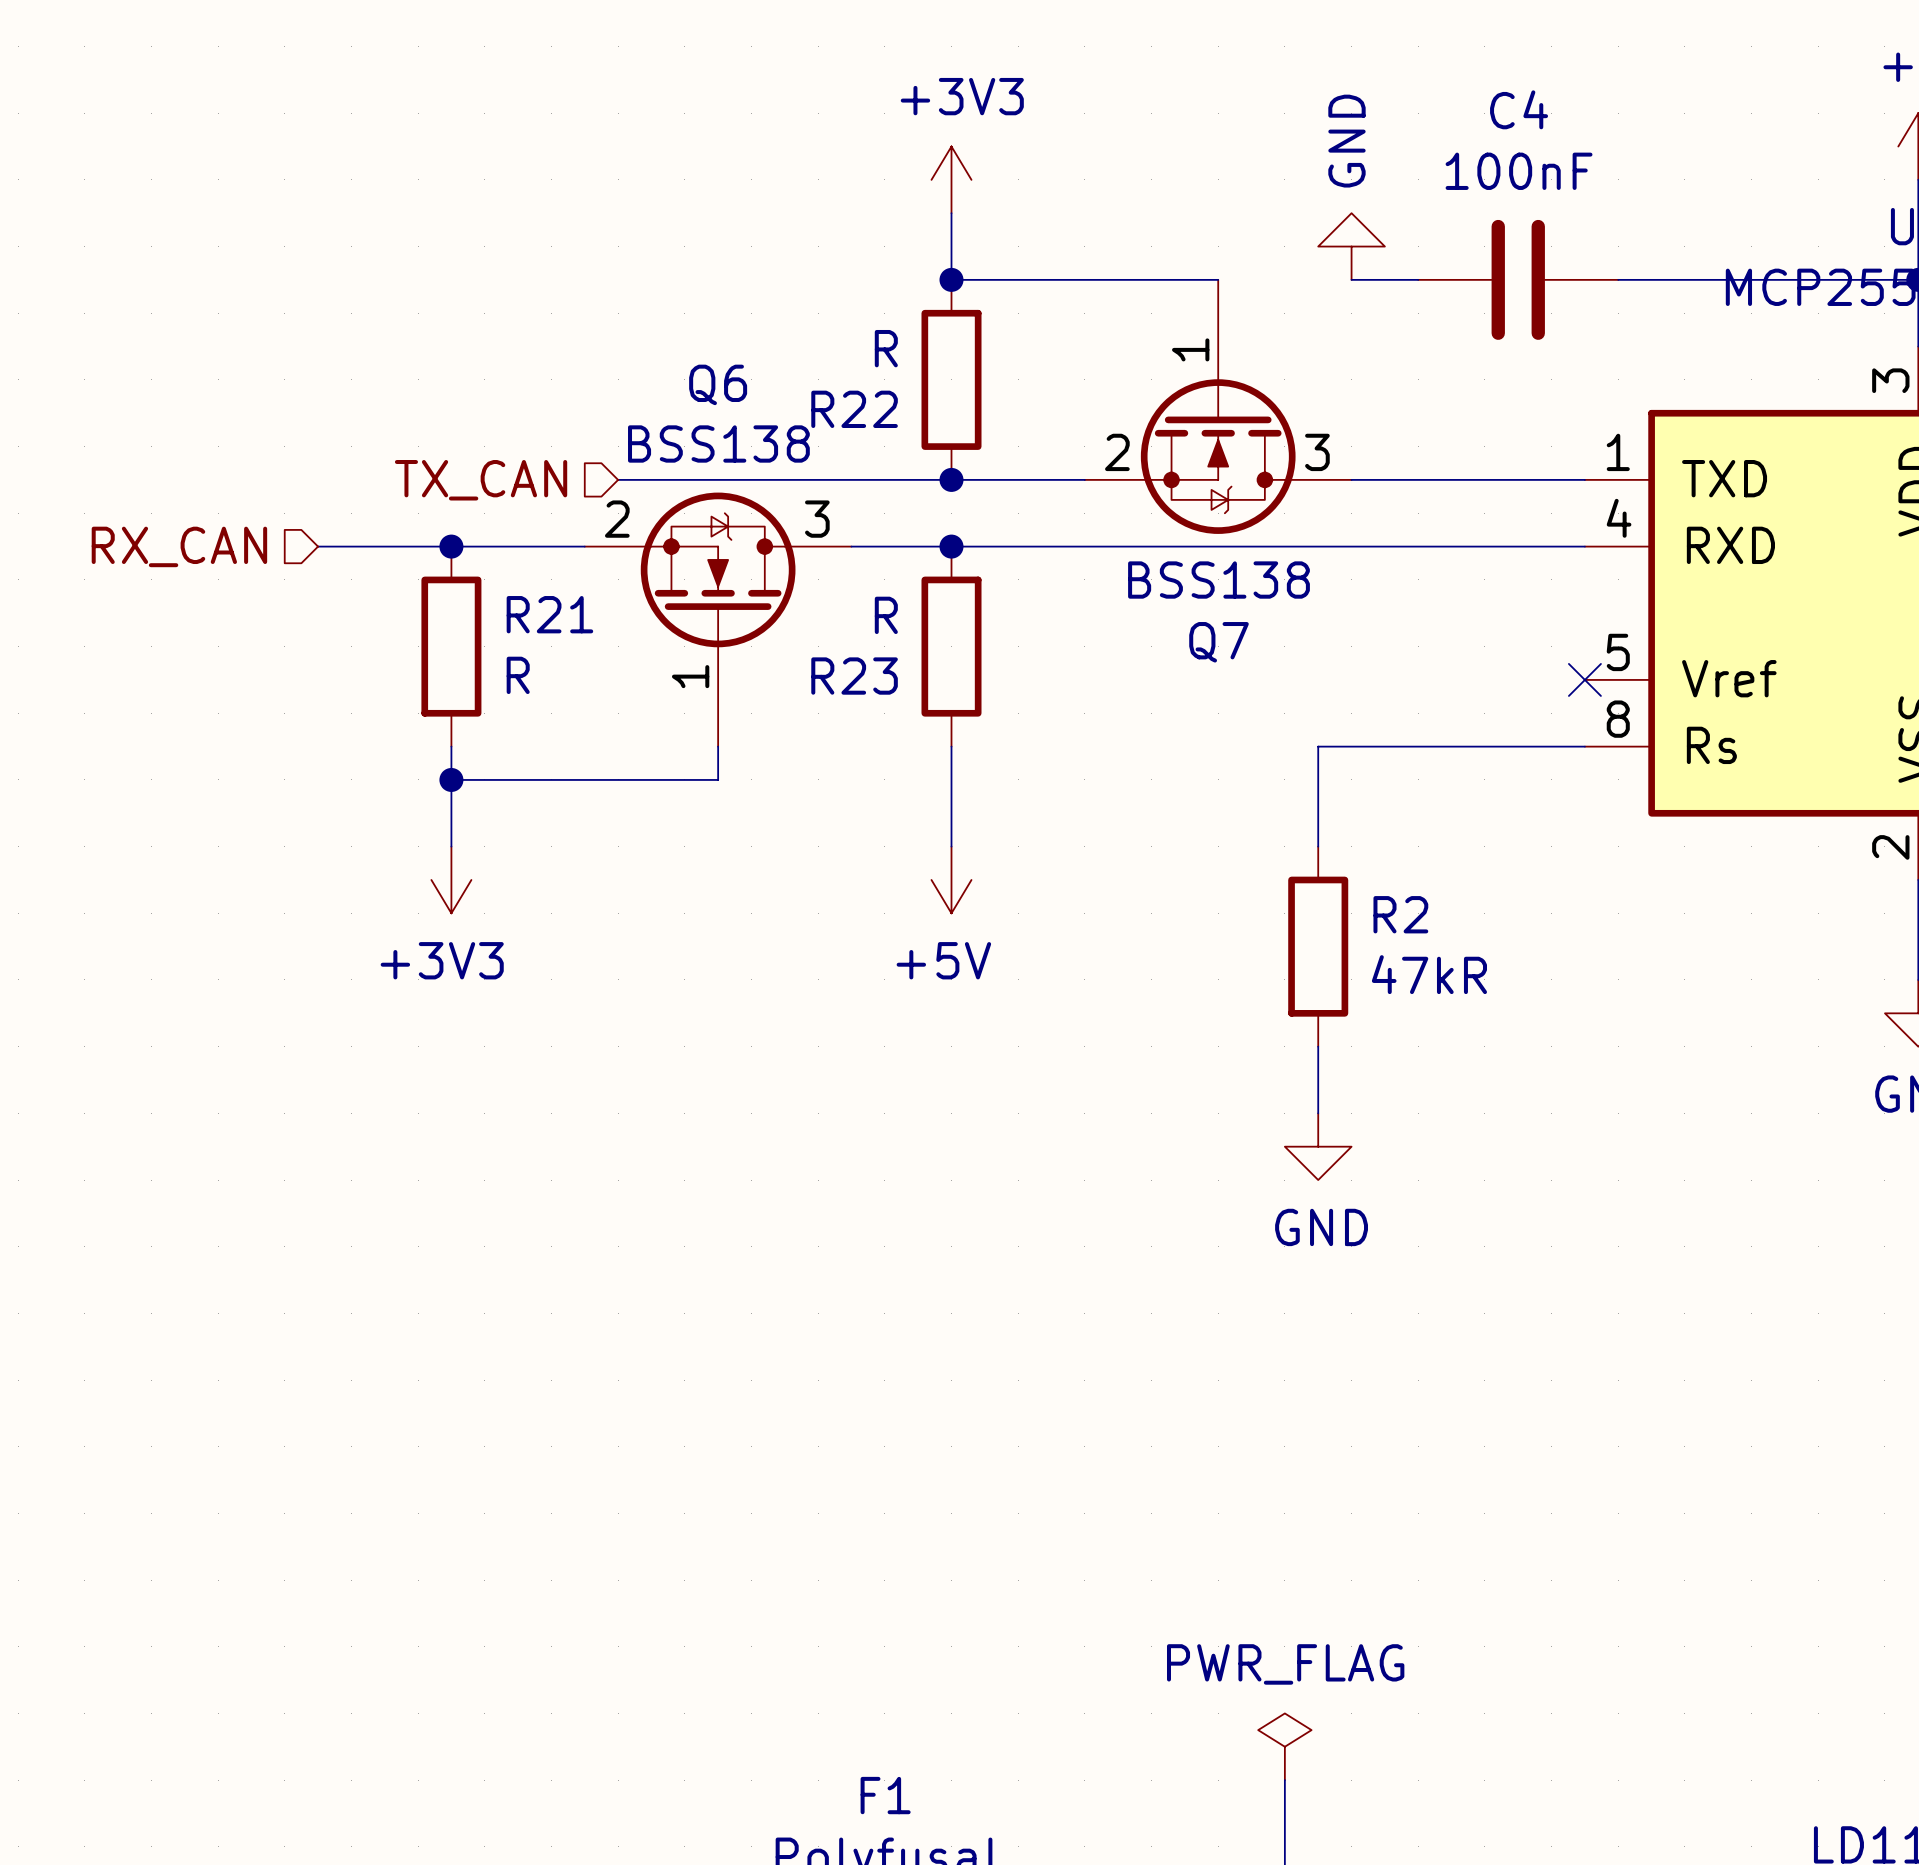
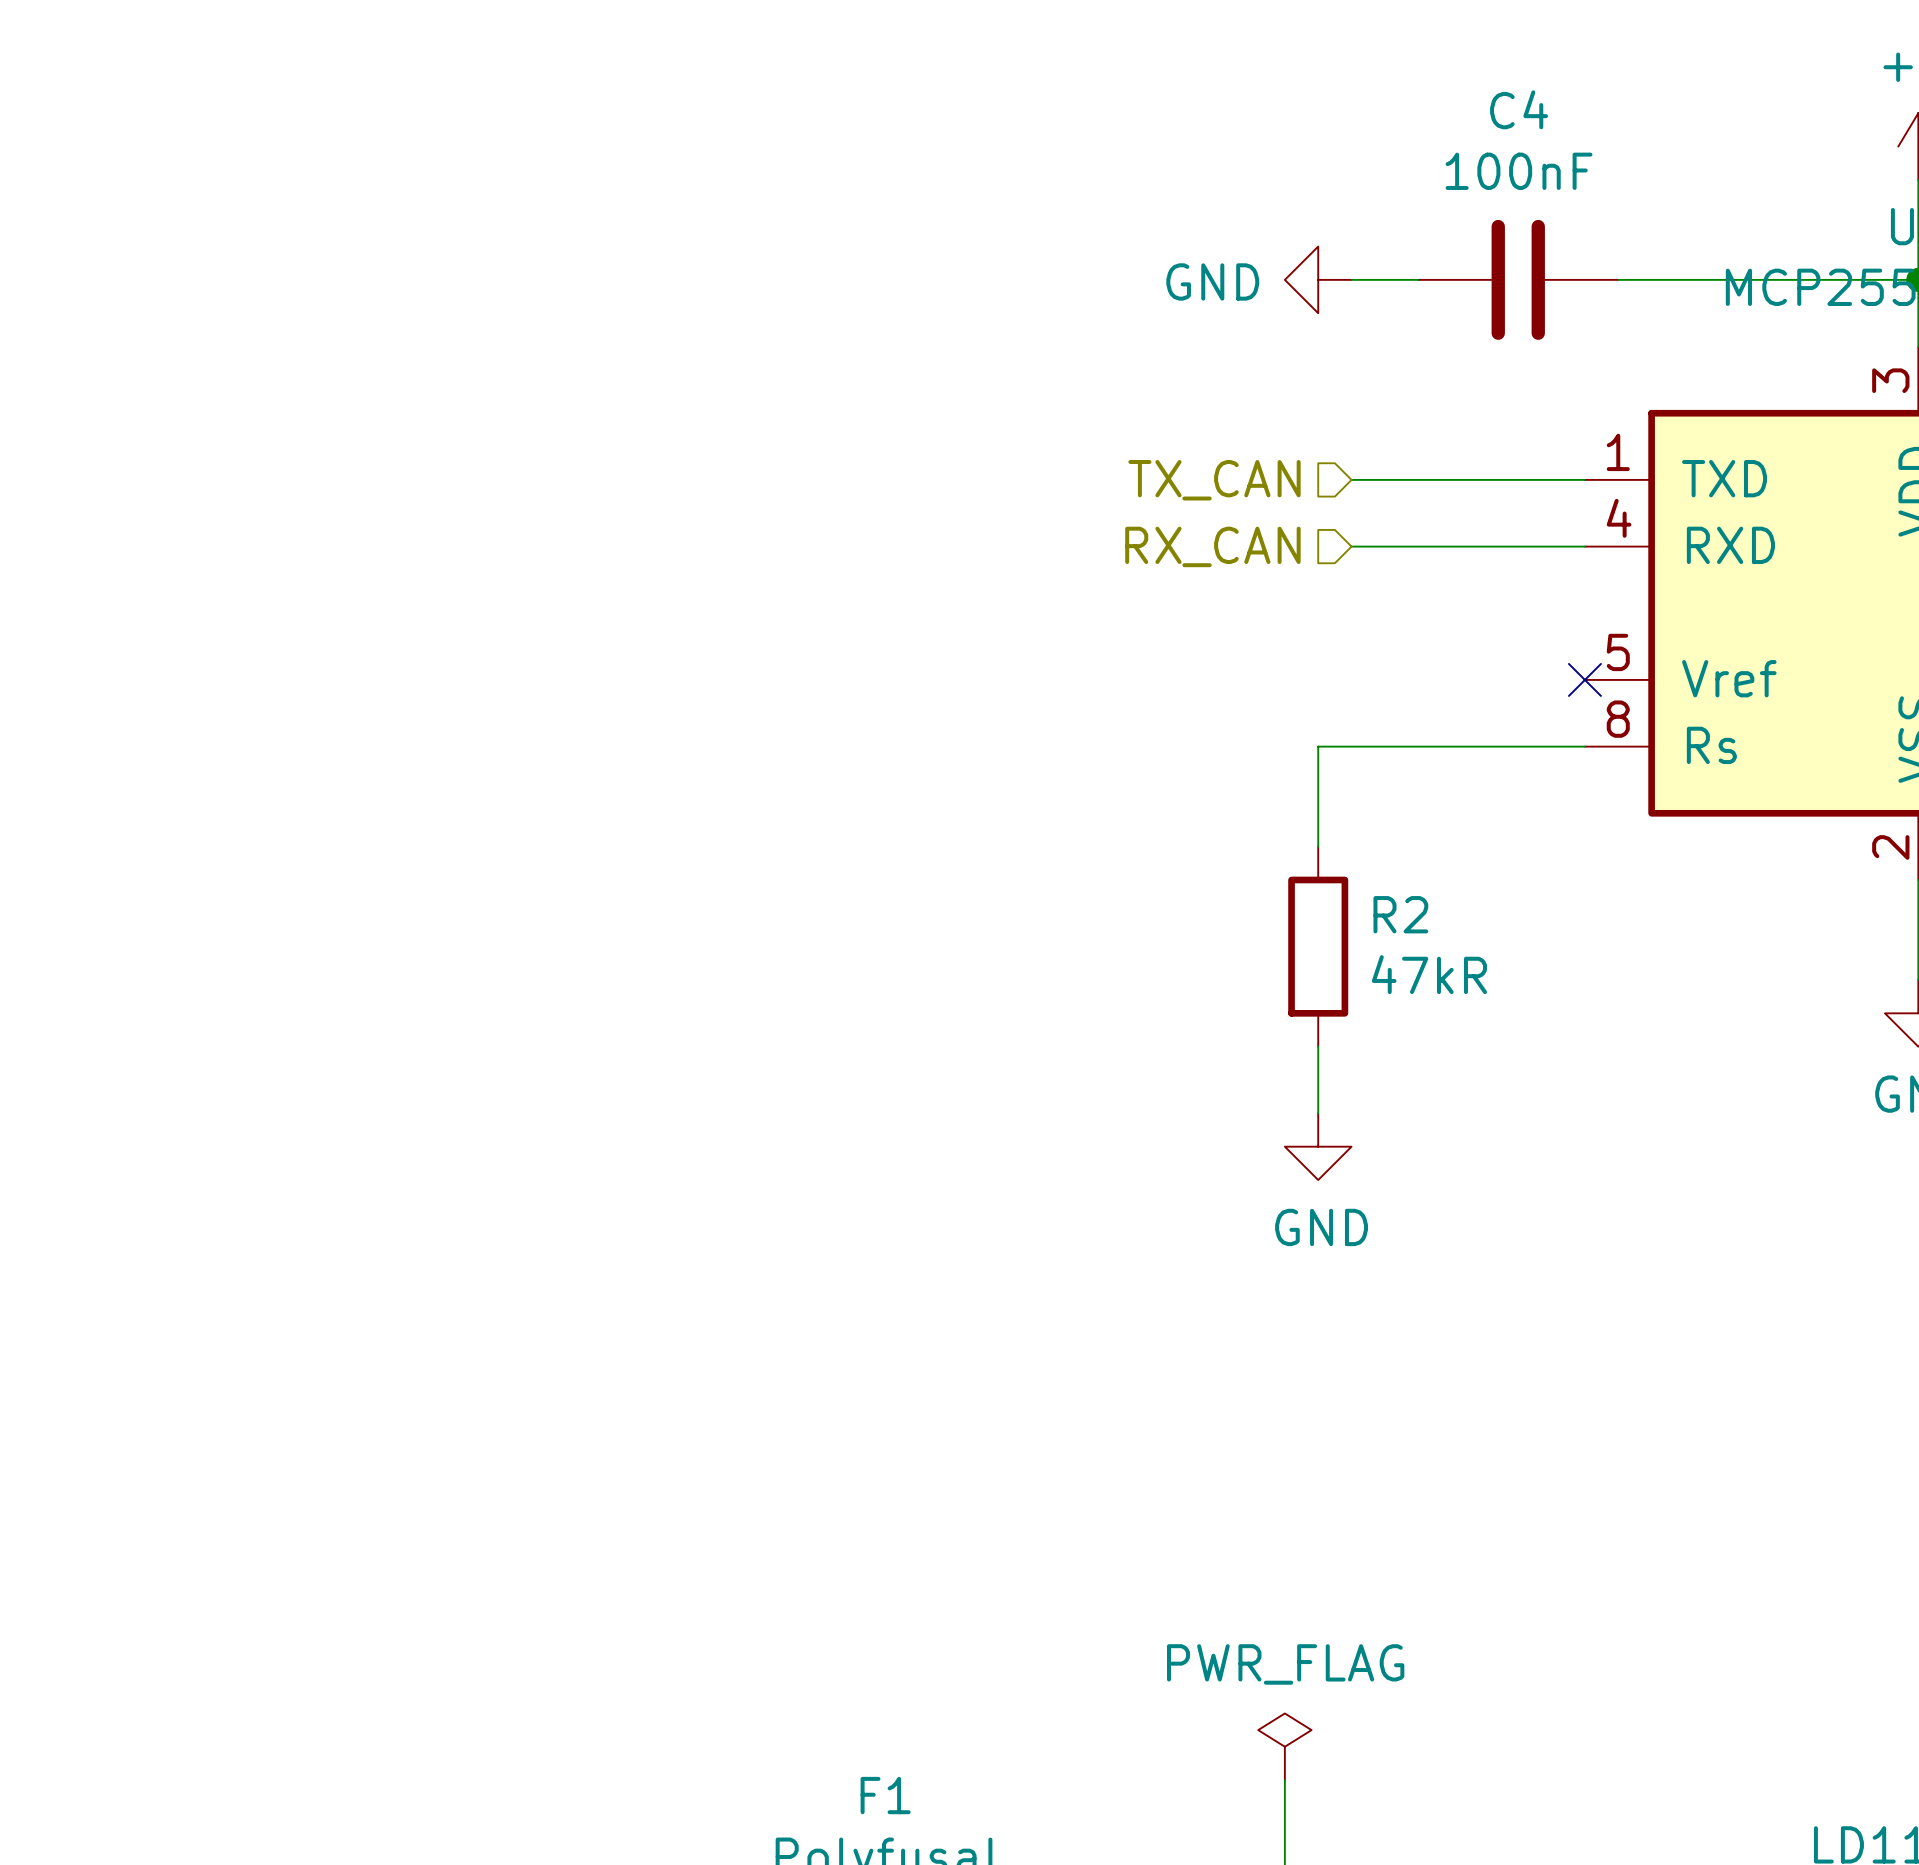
power symbol: +3V3 (951, 179) -> none
wire: (951, 213) (951, 279) (1218, 279) -> none
power symbol rotation: 0° (1351, 246) -> 90° counterclockwise (1318, 279)
power symbol position: GND (1351, 246) -> GND (1318, 279)
junction: (951, 279) -> none
R22: R (951, 379) -> none
Q7: BSS138 (1218, 406) -> none
wire: (618, 479) (1084, 479) -> none
junction: (951, 479) -> none
hierarchical label: TX_CAN (481, 480) -> none
hierarchical label: none -> TX_CAN (1214, 480)
hierarchical label: RX_CAN (179, 546) -> none
wire: (318, 546) (584, 546) -> none
junction: (451, 546) -> none
wire: (851, 546) (1351, 546) -> none
junction: (951, 546) -> none
hierarchical label: none -> RX_CAN (1212, 546)
Q6: BSS138 (718, 619) -> none
R21: R (451, 646) -> none
R23: R (951, 646) -> none
wire: (451, 746) (451, 846) -> none
wire: (718, 746) (718, 779) (451, 779) -> none
wire: (951, 746) (951, 846) -> none
junction: (451, 779) -> none
power symbol: +3V3 (451, 879) -> none
power symbol: +5V (951, 879) -> none

